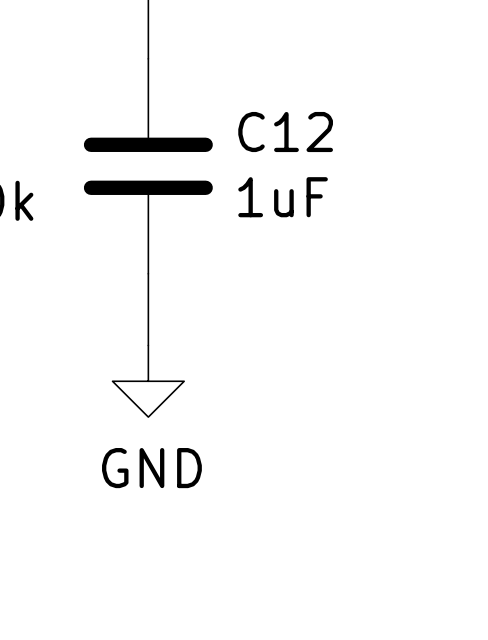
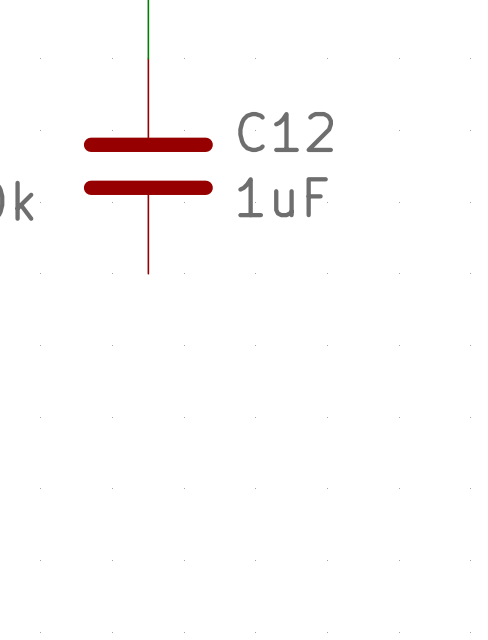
wire: (148, 273) (148, 345) -> none
power symbol: GND (148, 381) -> none

